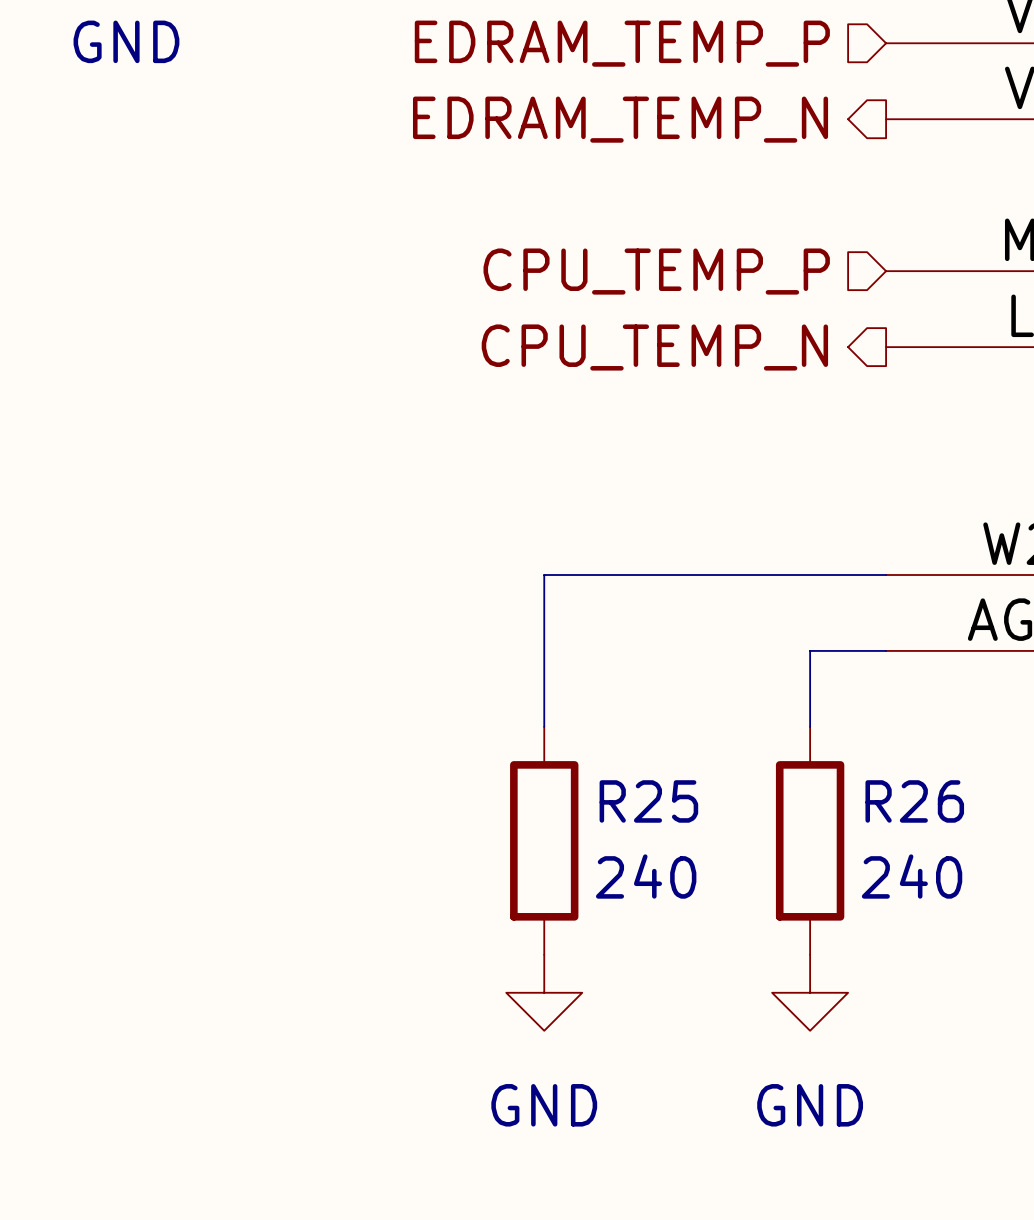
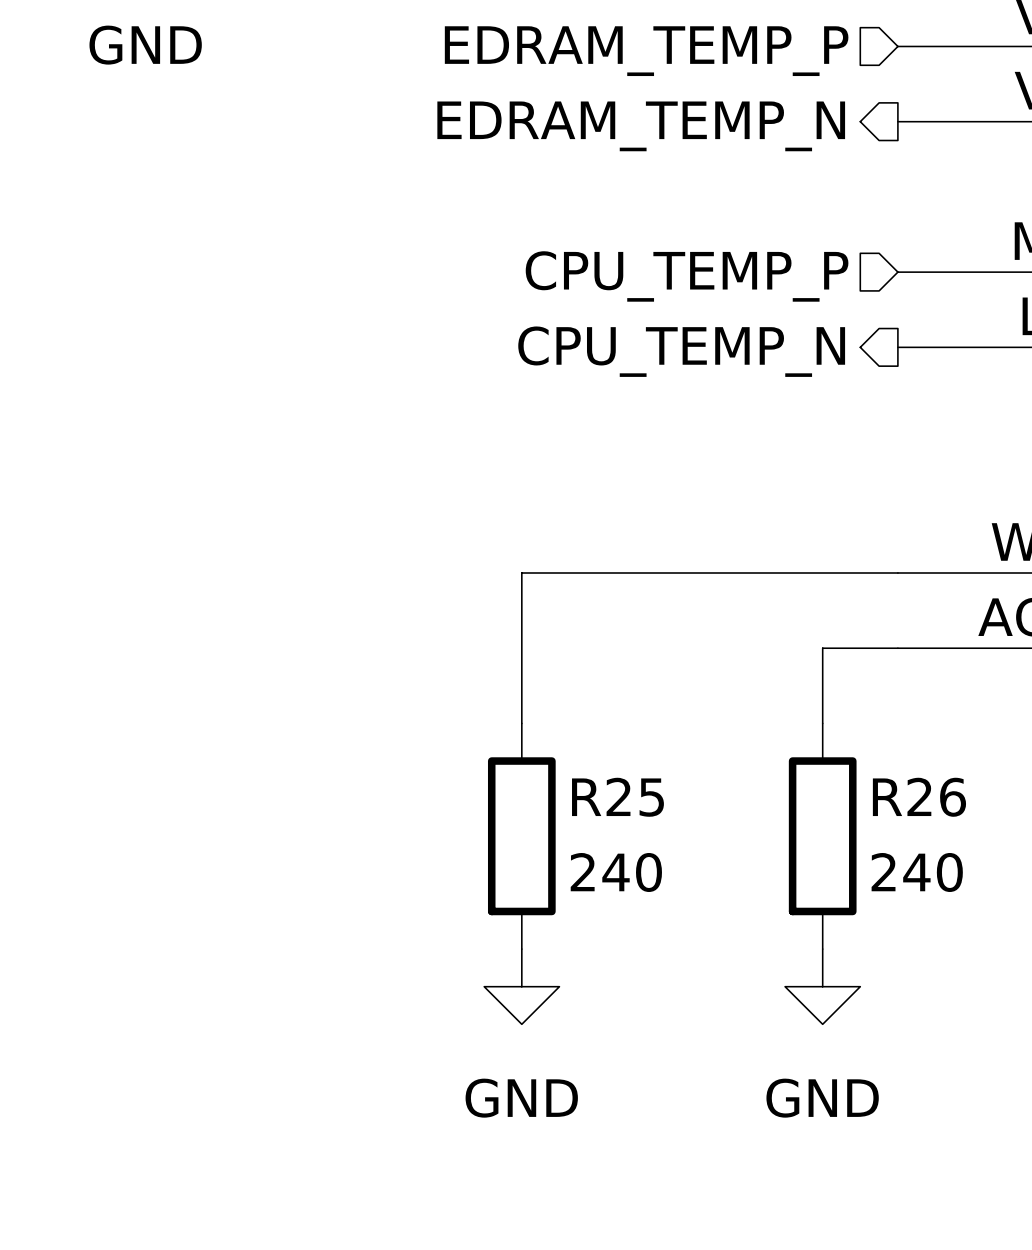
wire: (544, 575) (544, 726) -> (559, 573) (521, 573) (521, 723)
R25 position: (544, 840) -> (521, 836)
power symbol position: GND (544, 992) -> GND (521, 986)

